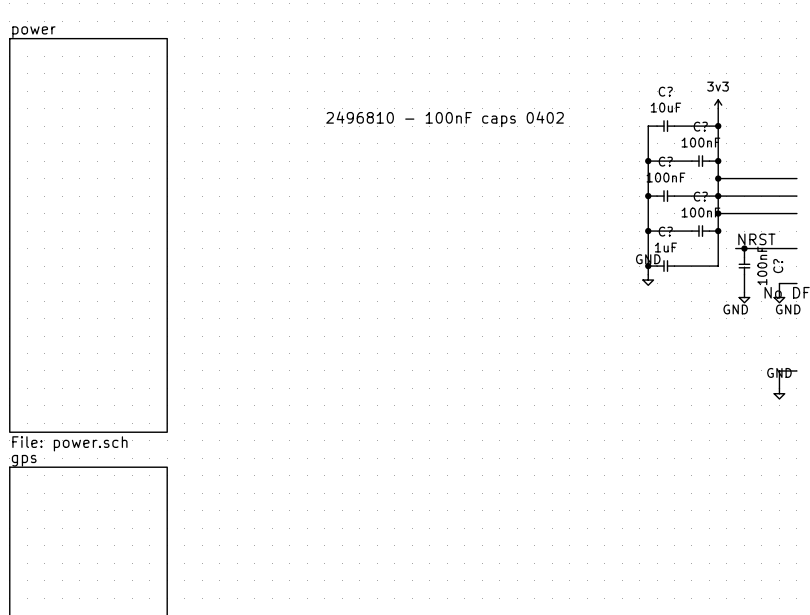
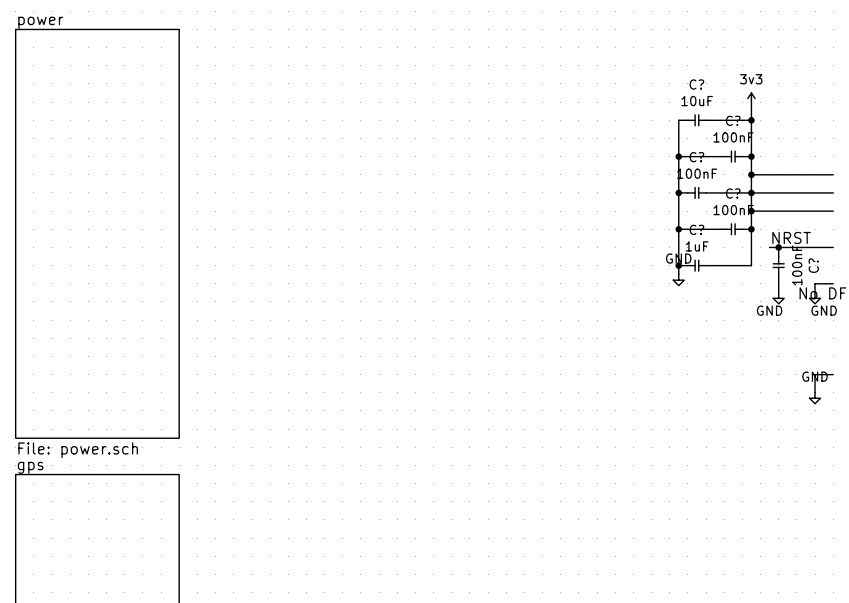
text: 2496810 - 100nF caps 0402 (445, 119) -> none

